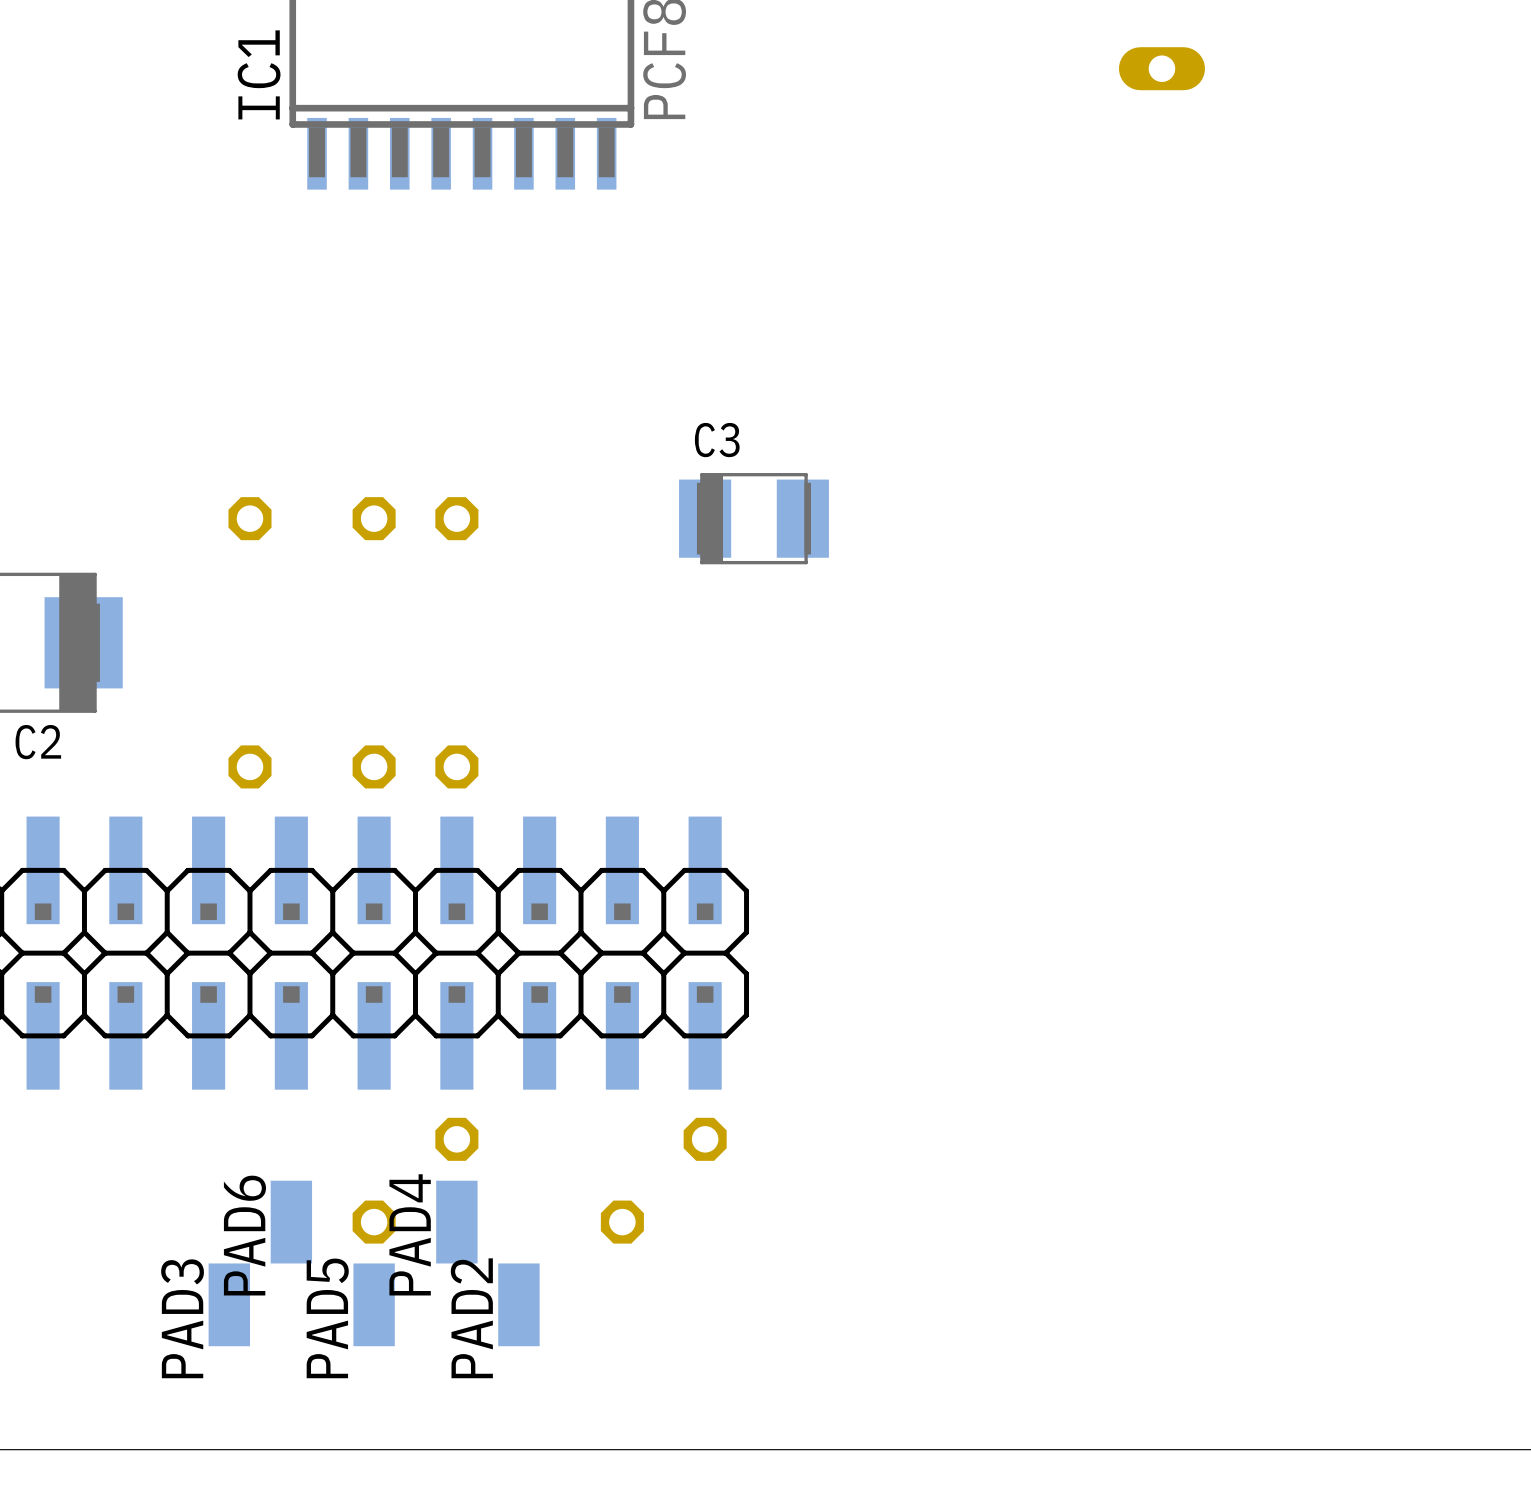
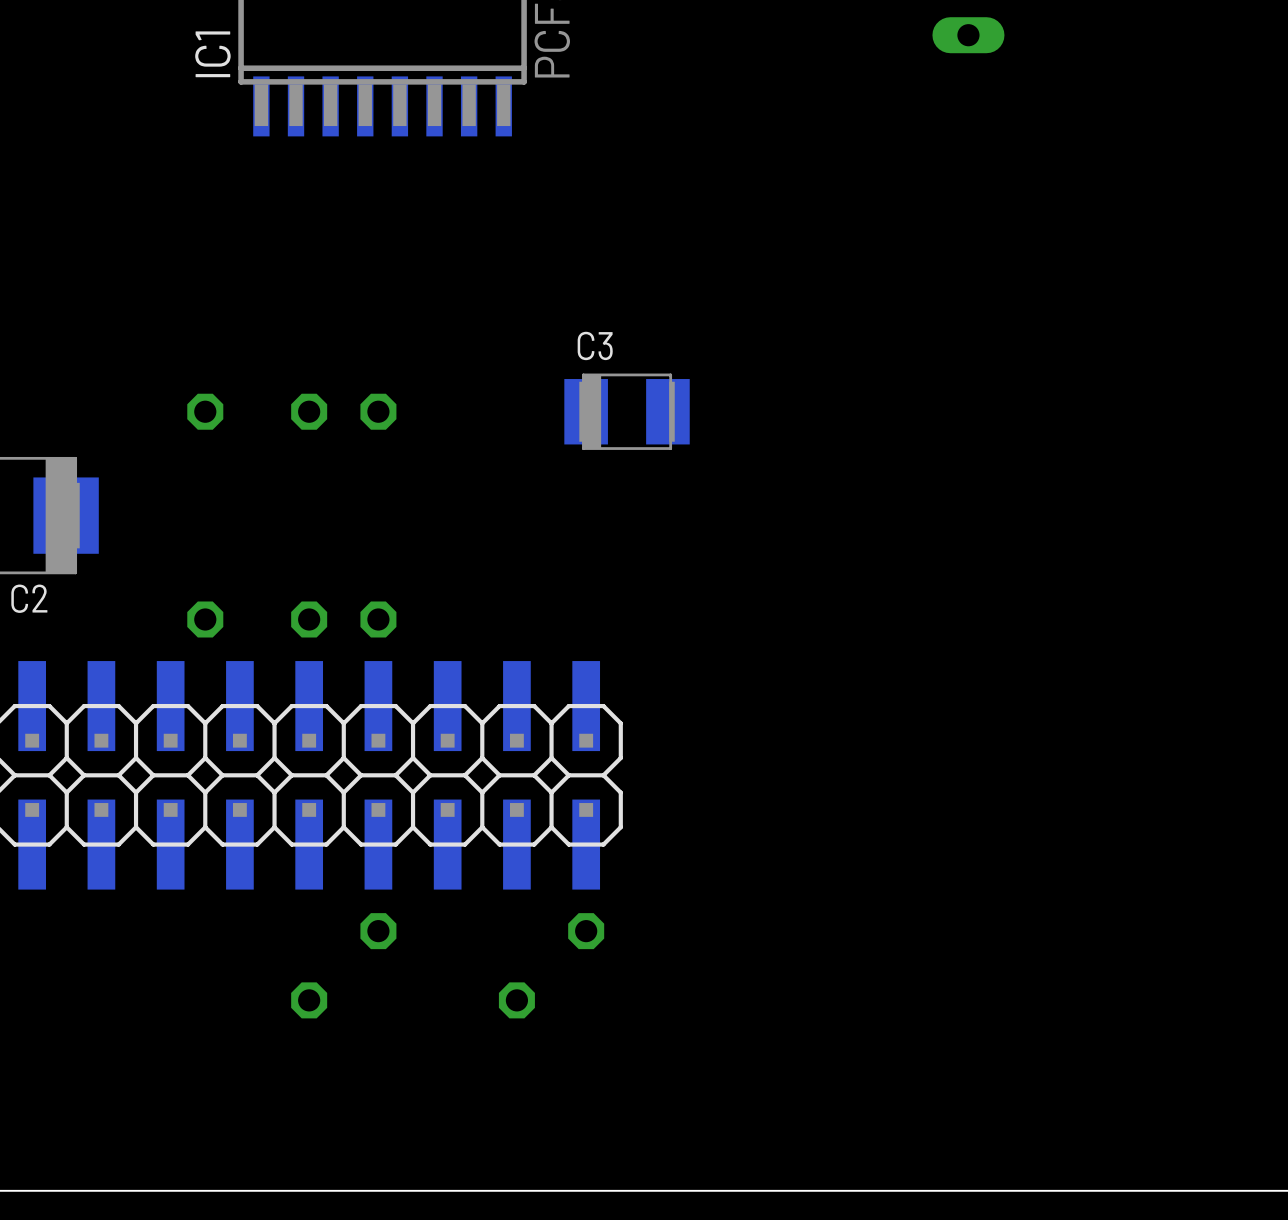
PAD6: (291, 1222) -> none
PAD4: (456, 1222) -> none
PAD3: (229, 1304) -> none
PAD5: (374, 1304) -> none
PAD2: (518, 1304) -> none

